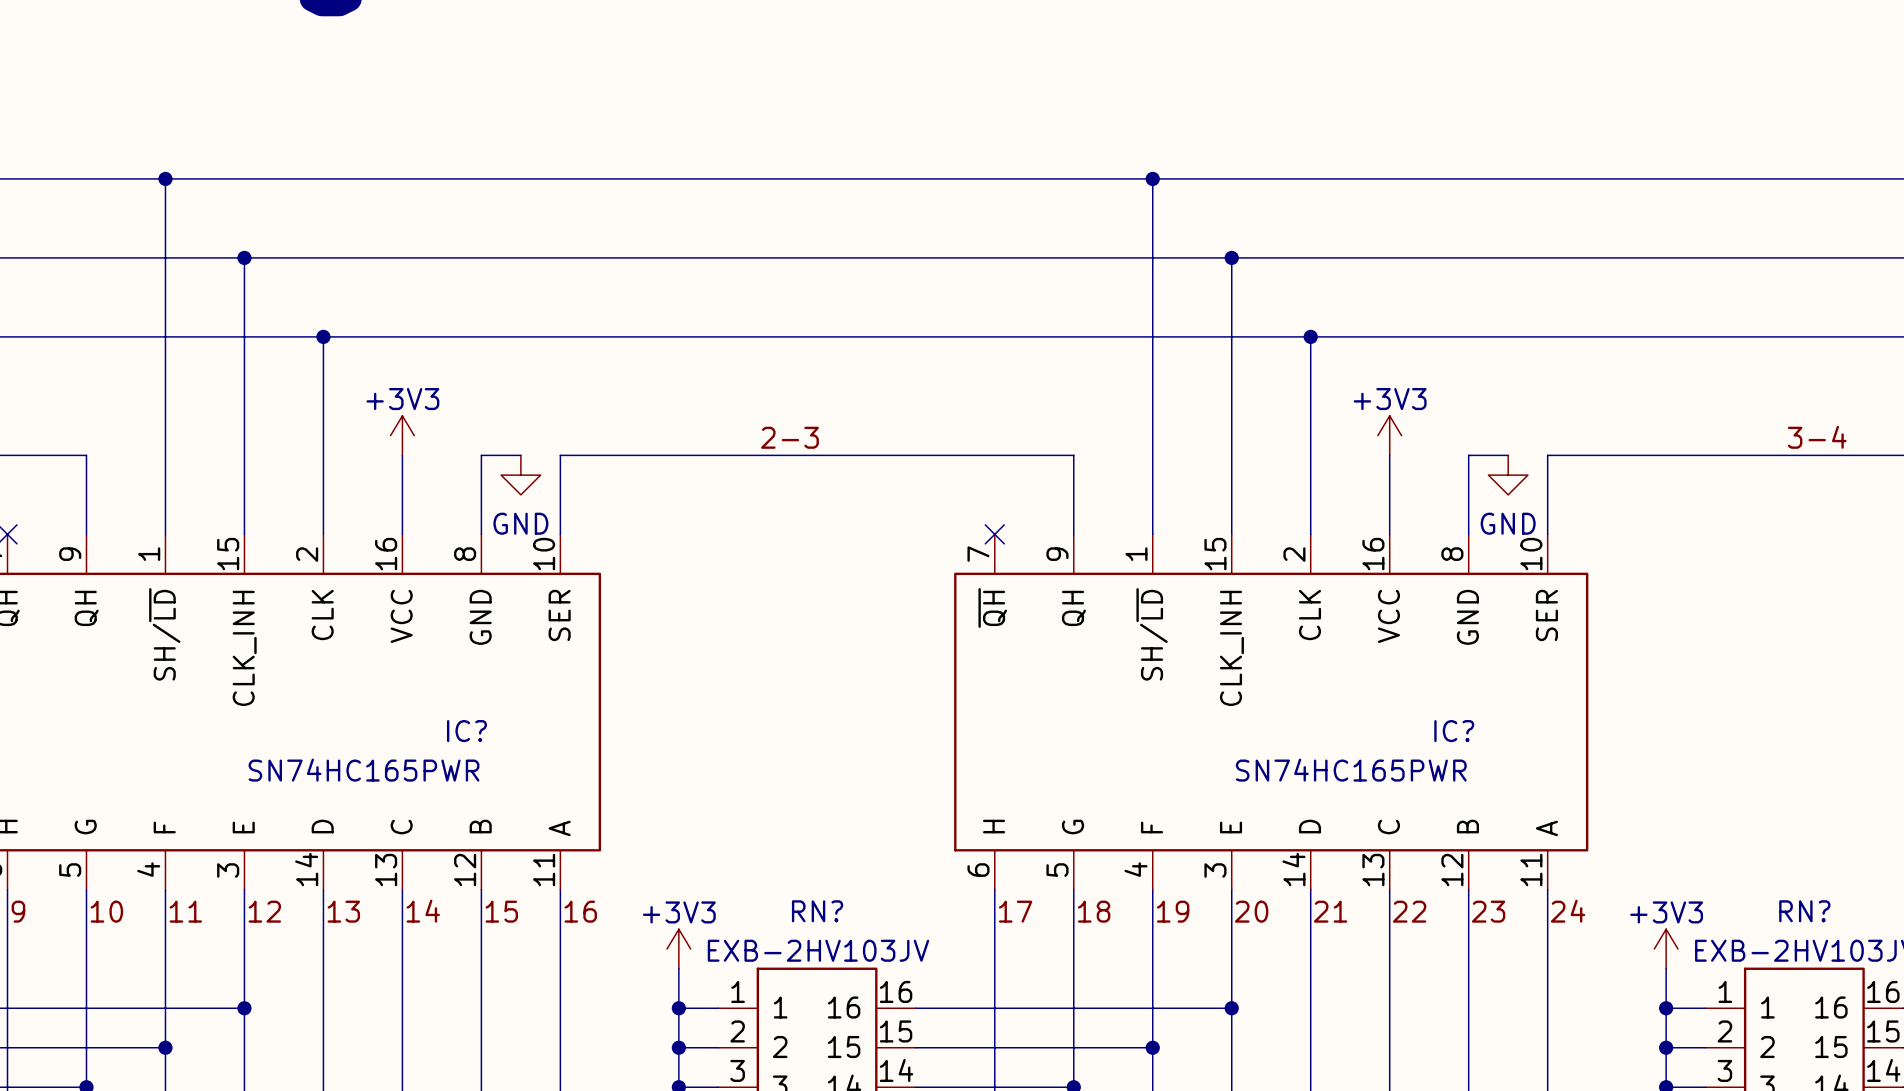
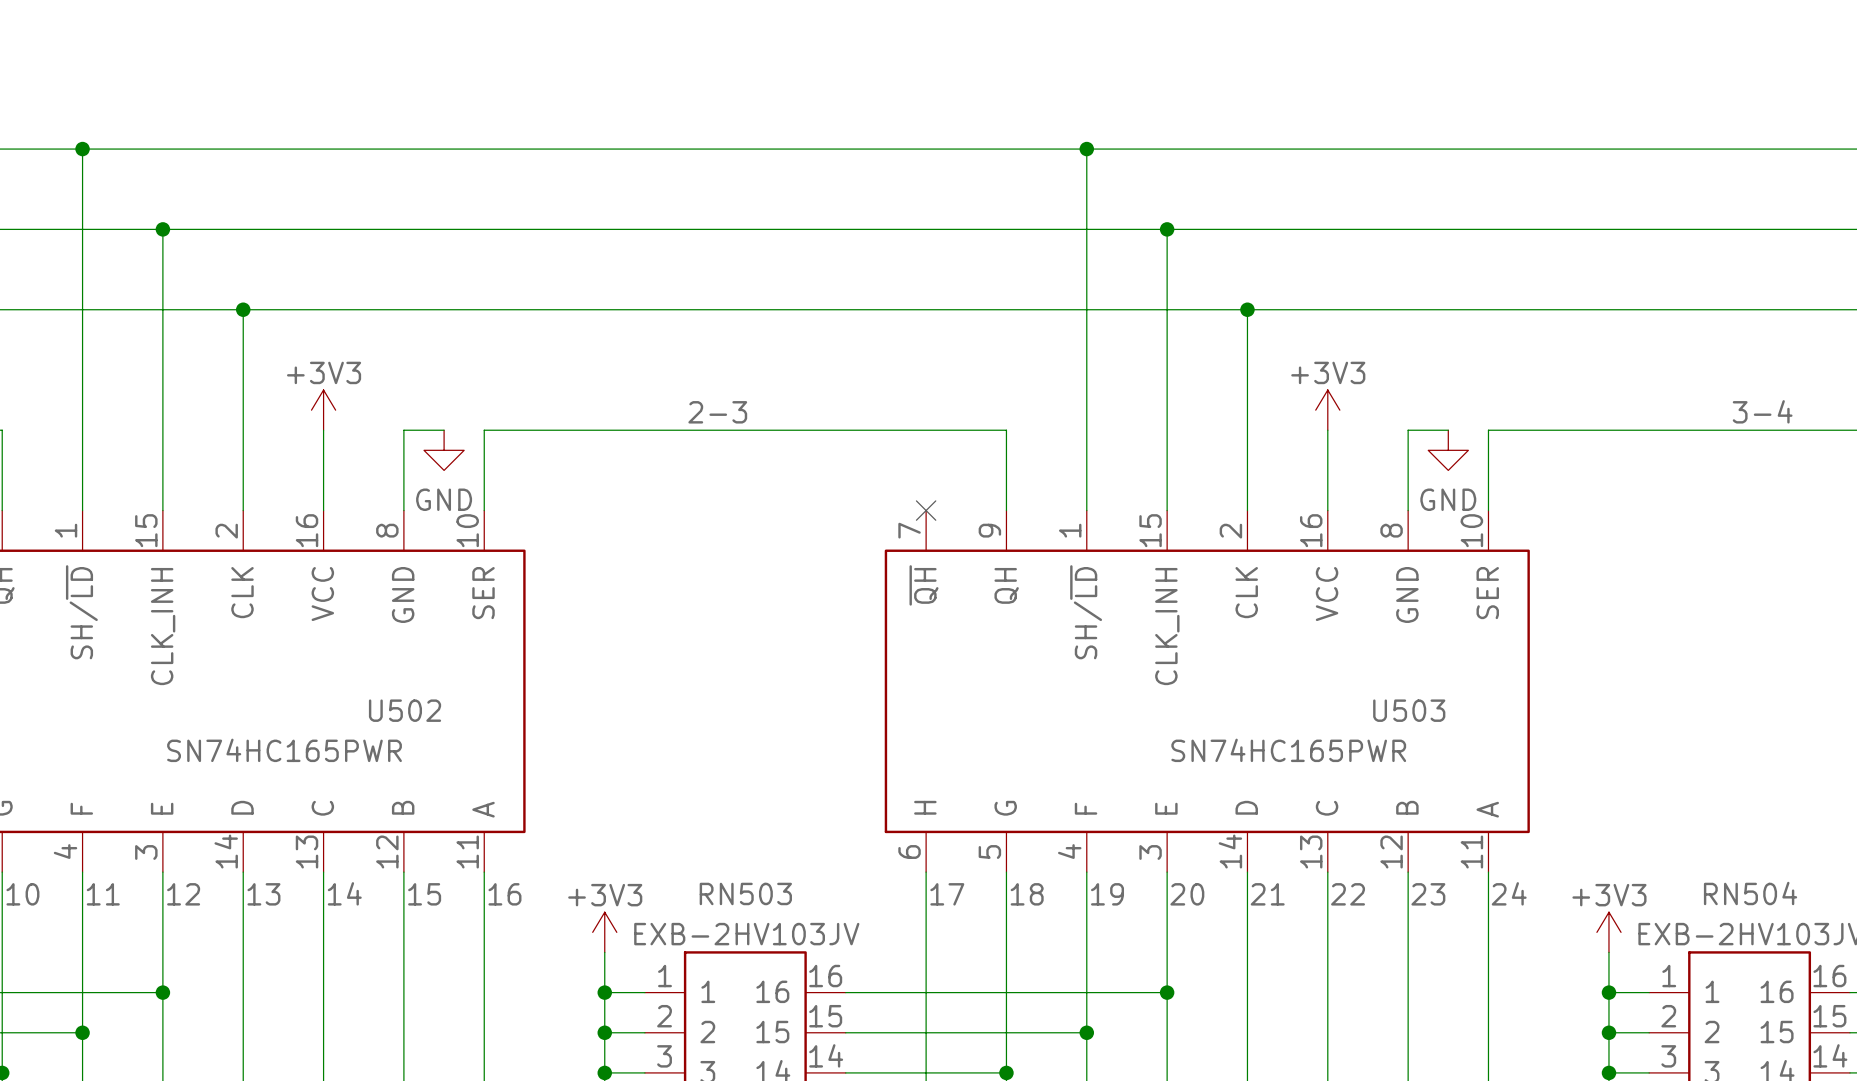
IC? name: IC? (466, 731) -> U502 (405, 710)
IC? name: IC? (1454, 731) -> U503 (1409, 710)
RN? name: RN? (817, 911) -> RN503 (745, 893)
RN? name: RN? (1804, 911) -> RN504 (1750, 893)

